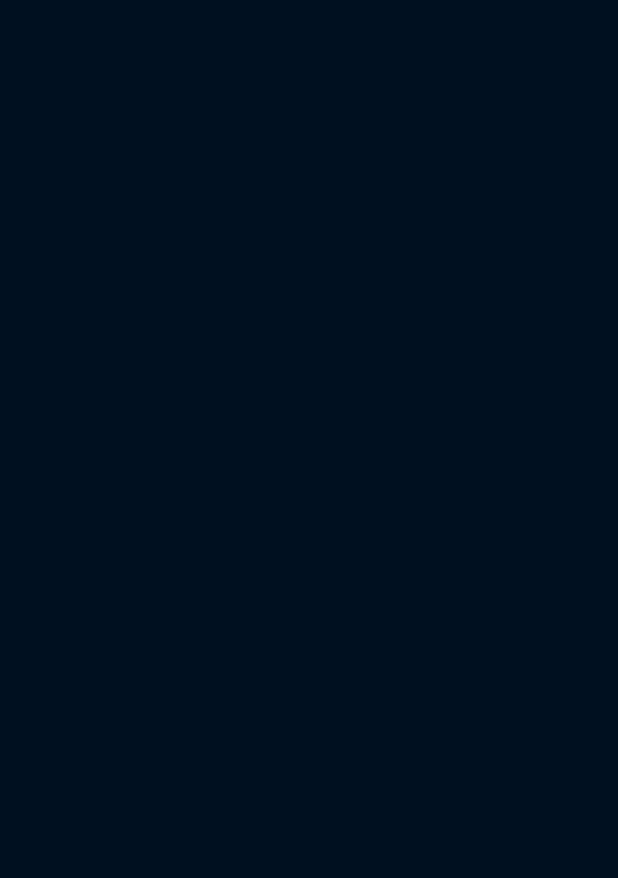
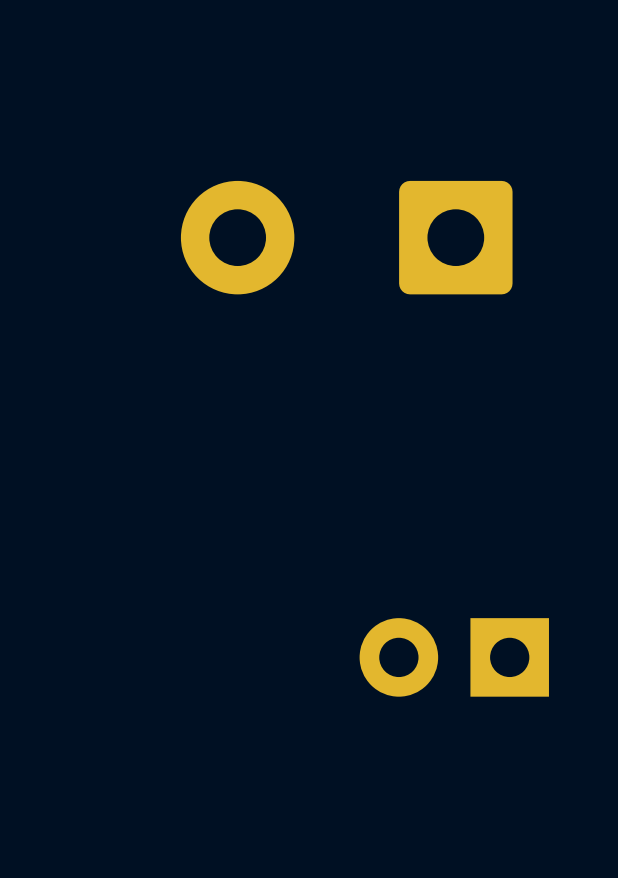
part: none -> (346, 237)
part: none -> (454, 657)

